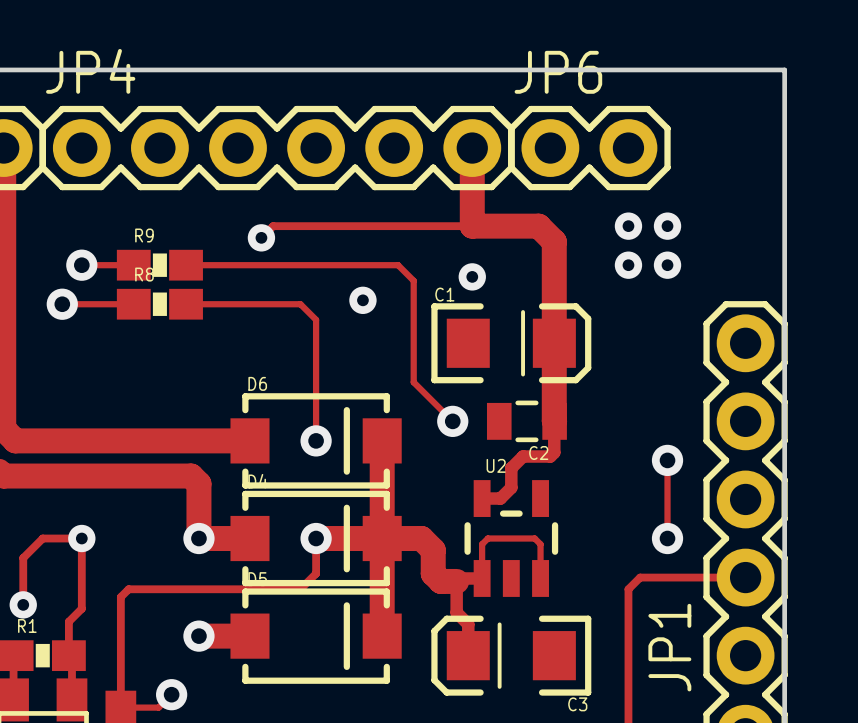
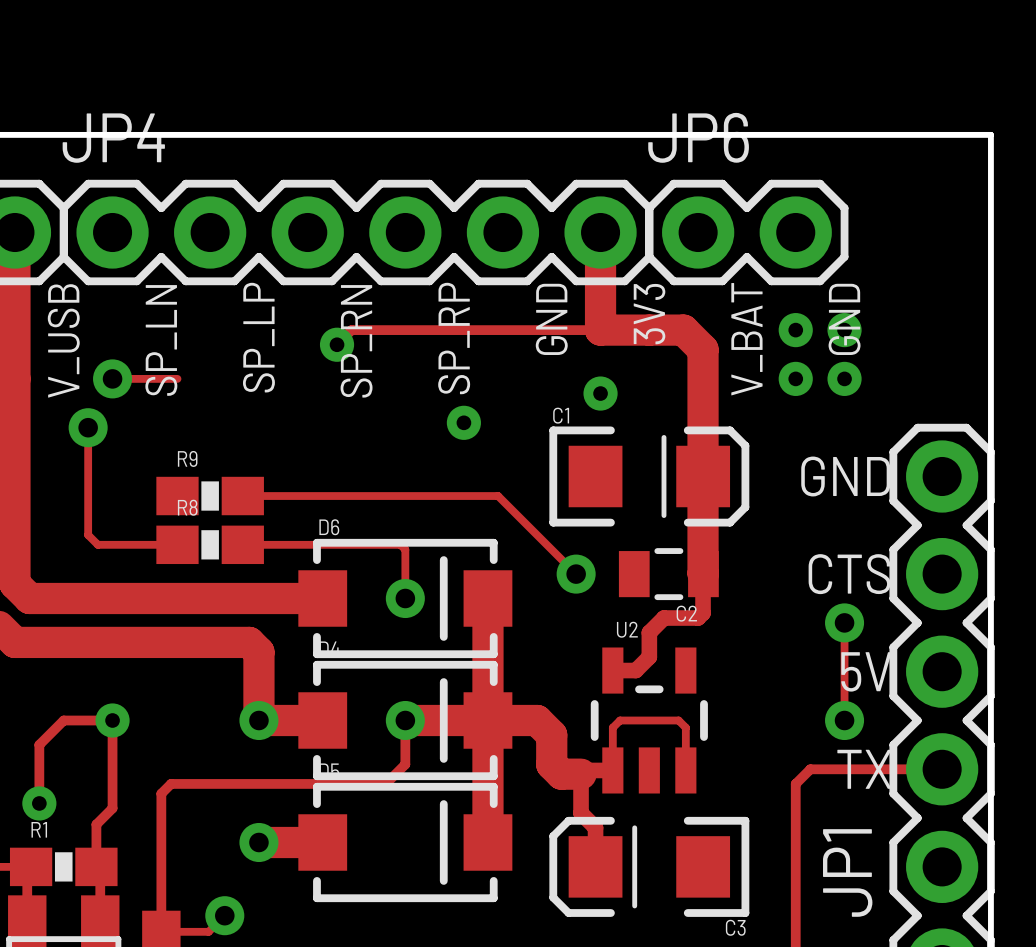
text: none -> 3V3 (649, 314)
text: none -> GND (551, 319)
text: none -> GND (844, 319)
text: none -> V_BAT (746, 339)
text: none -> SP_LP (258, 337)
text: none -> SP_LN (161, 340)
text: none -> V_USB (63, 340)
text: none -> SP_RP (454, 338)
text: none -> SP_RN (356, 341)
R9 position: (159, 265) -> (210, 496)
track: (186, 265) (398, 265) (413, 280) (413, 382) -> (242, 496) (498, 496) (527, 525)
track: (62, 304) (133, 304) -> (88, 427) (88, 535) (97, 544) (177, 544)
R8 position: (159, 304) -> (210, 544)
track: (186, 304) (300, 304) (316, 319) (316, 401) -> (242, 544) (400, 544) (405, 549)
text: none -> GND (845, 476)
text: none -> CTS (849, 574)
text: none -> 5V (866, 671)
text: none -> TX (864, 769)

